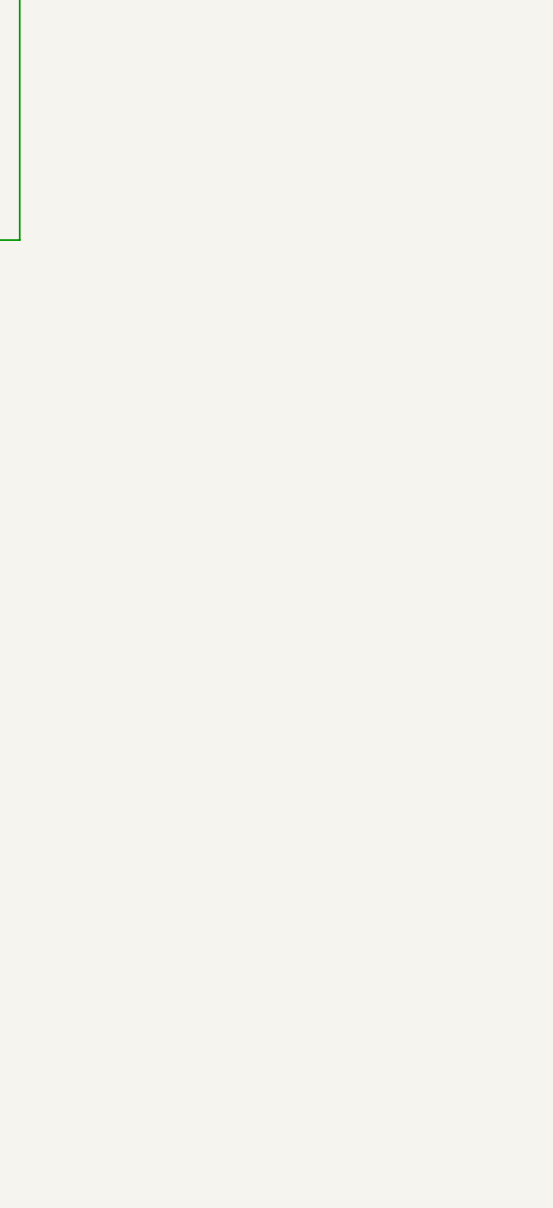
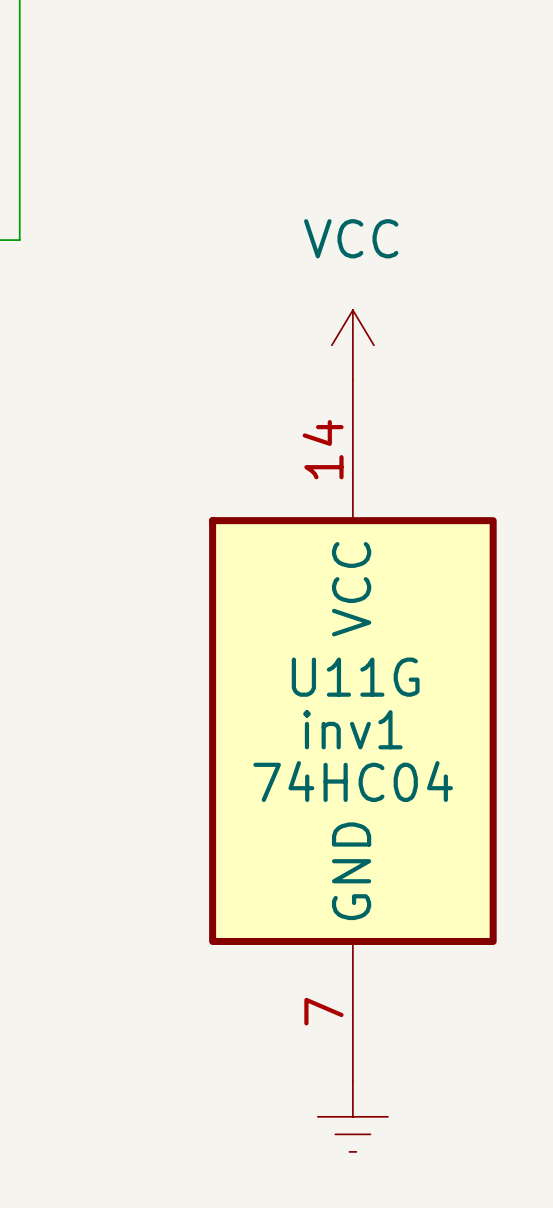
power symbol: none -> VCC (352, 345)
U11G: none -> 74HC04 (352, 731)
power symbol: none -> (352, 1116)

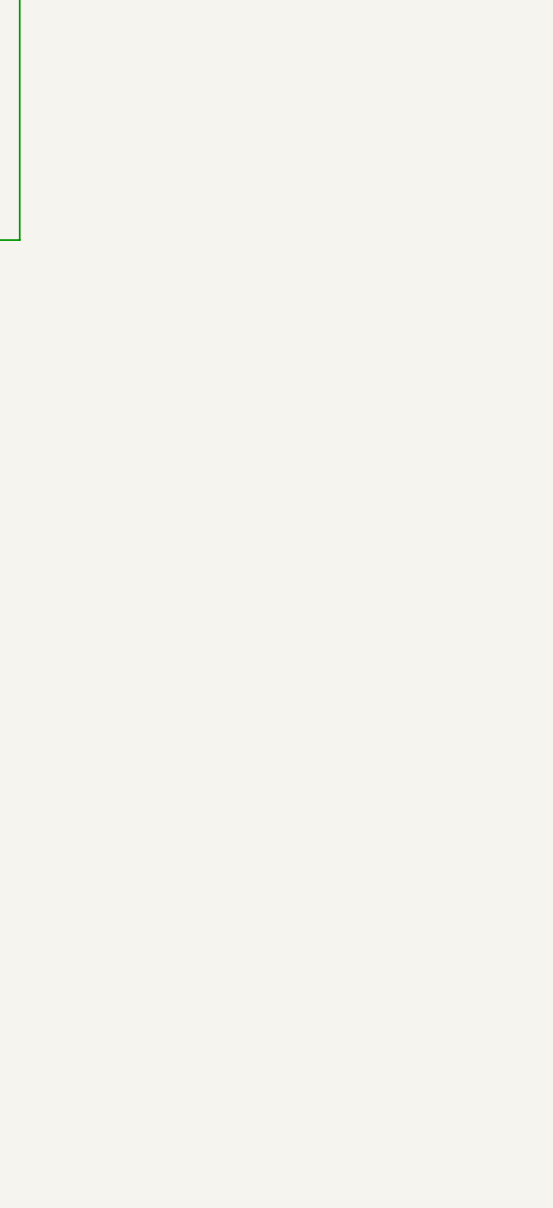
power symbol: VCC (352, 345) -> none
U11G: 74HC04 (352, 731) -> none
power symbol: (352, 1116) -> none

